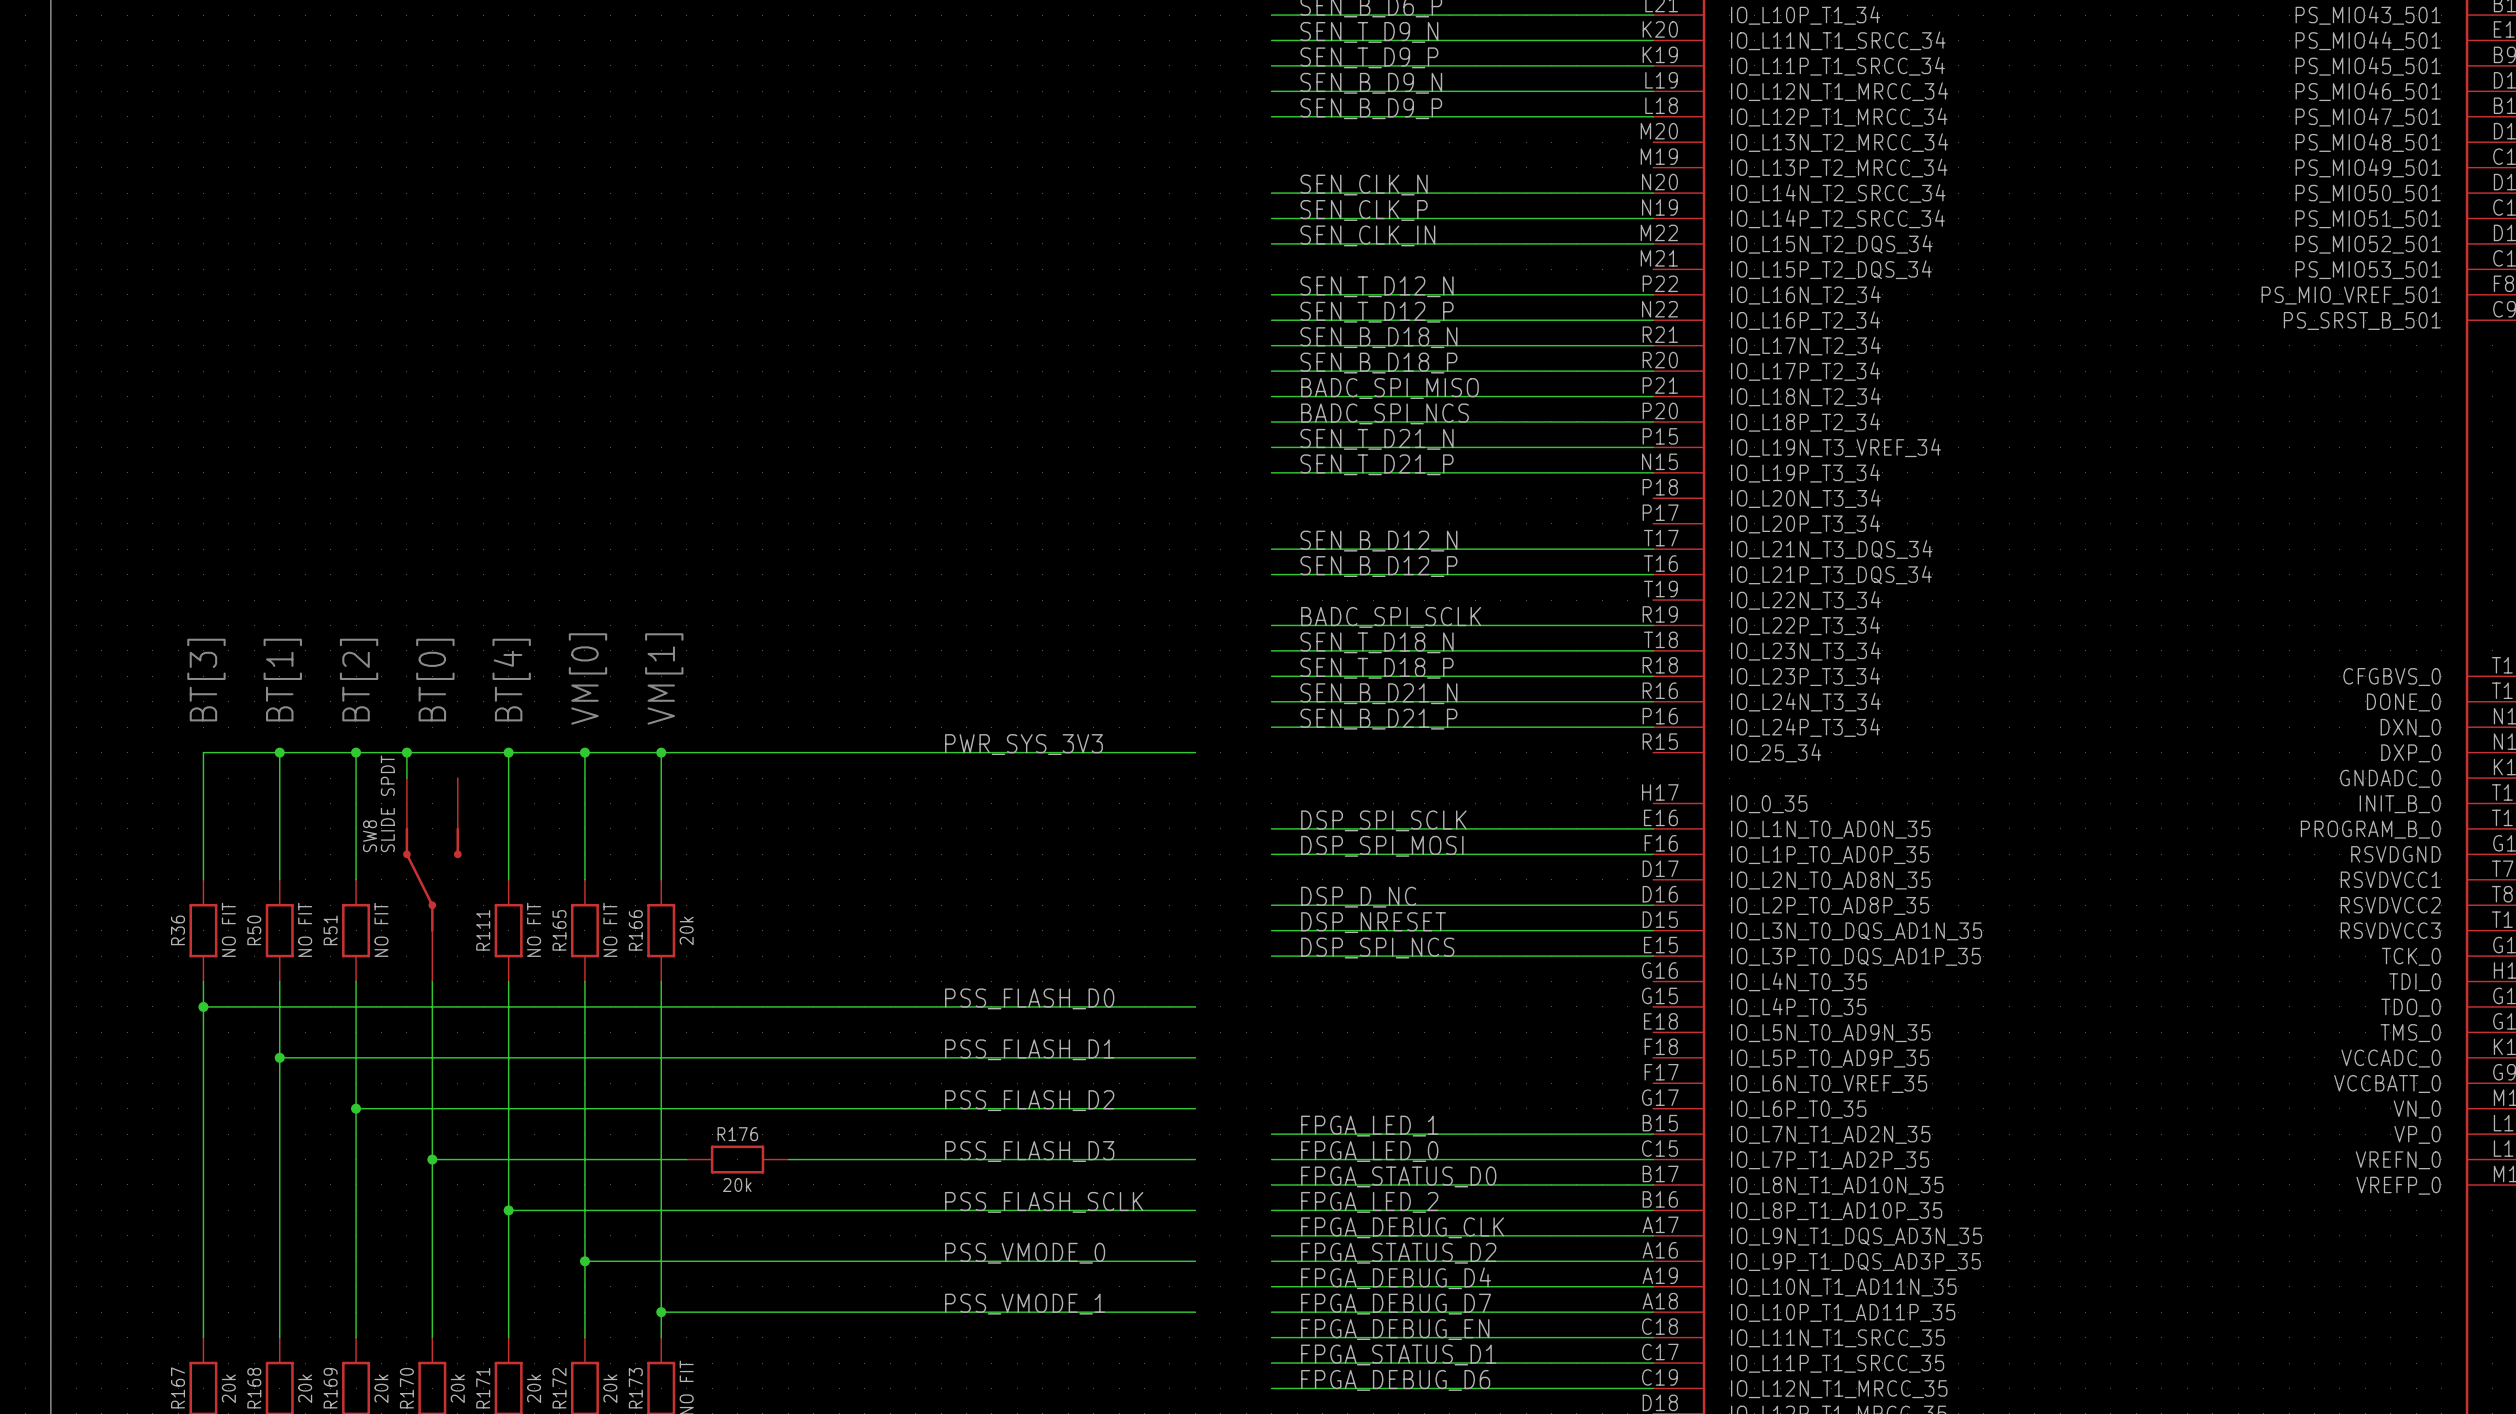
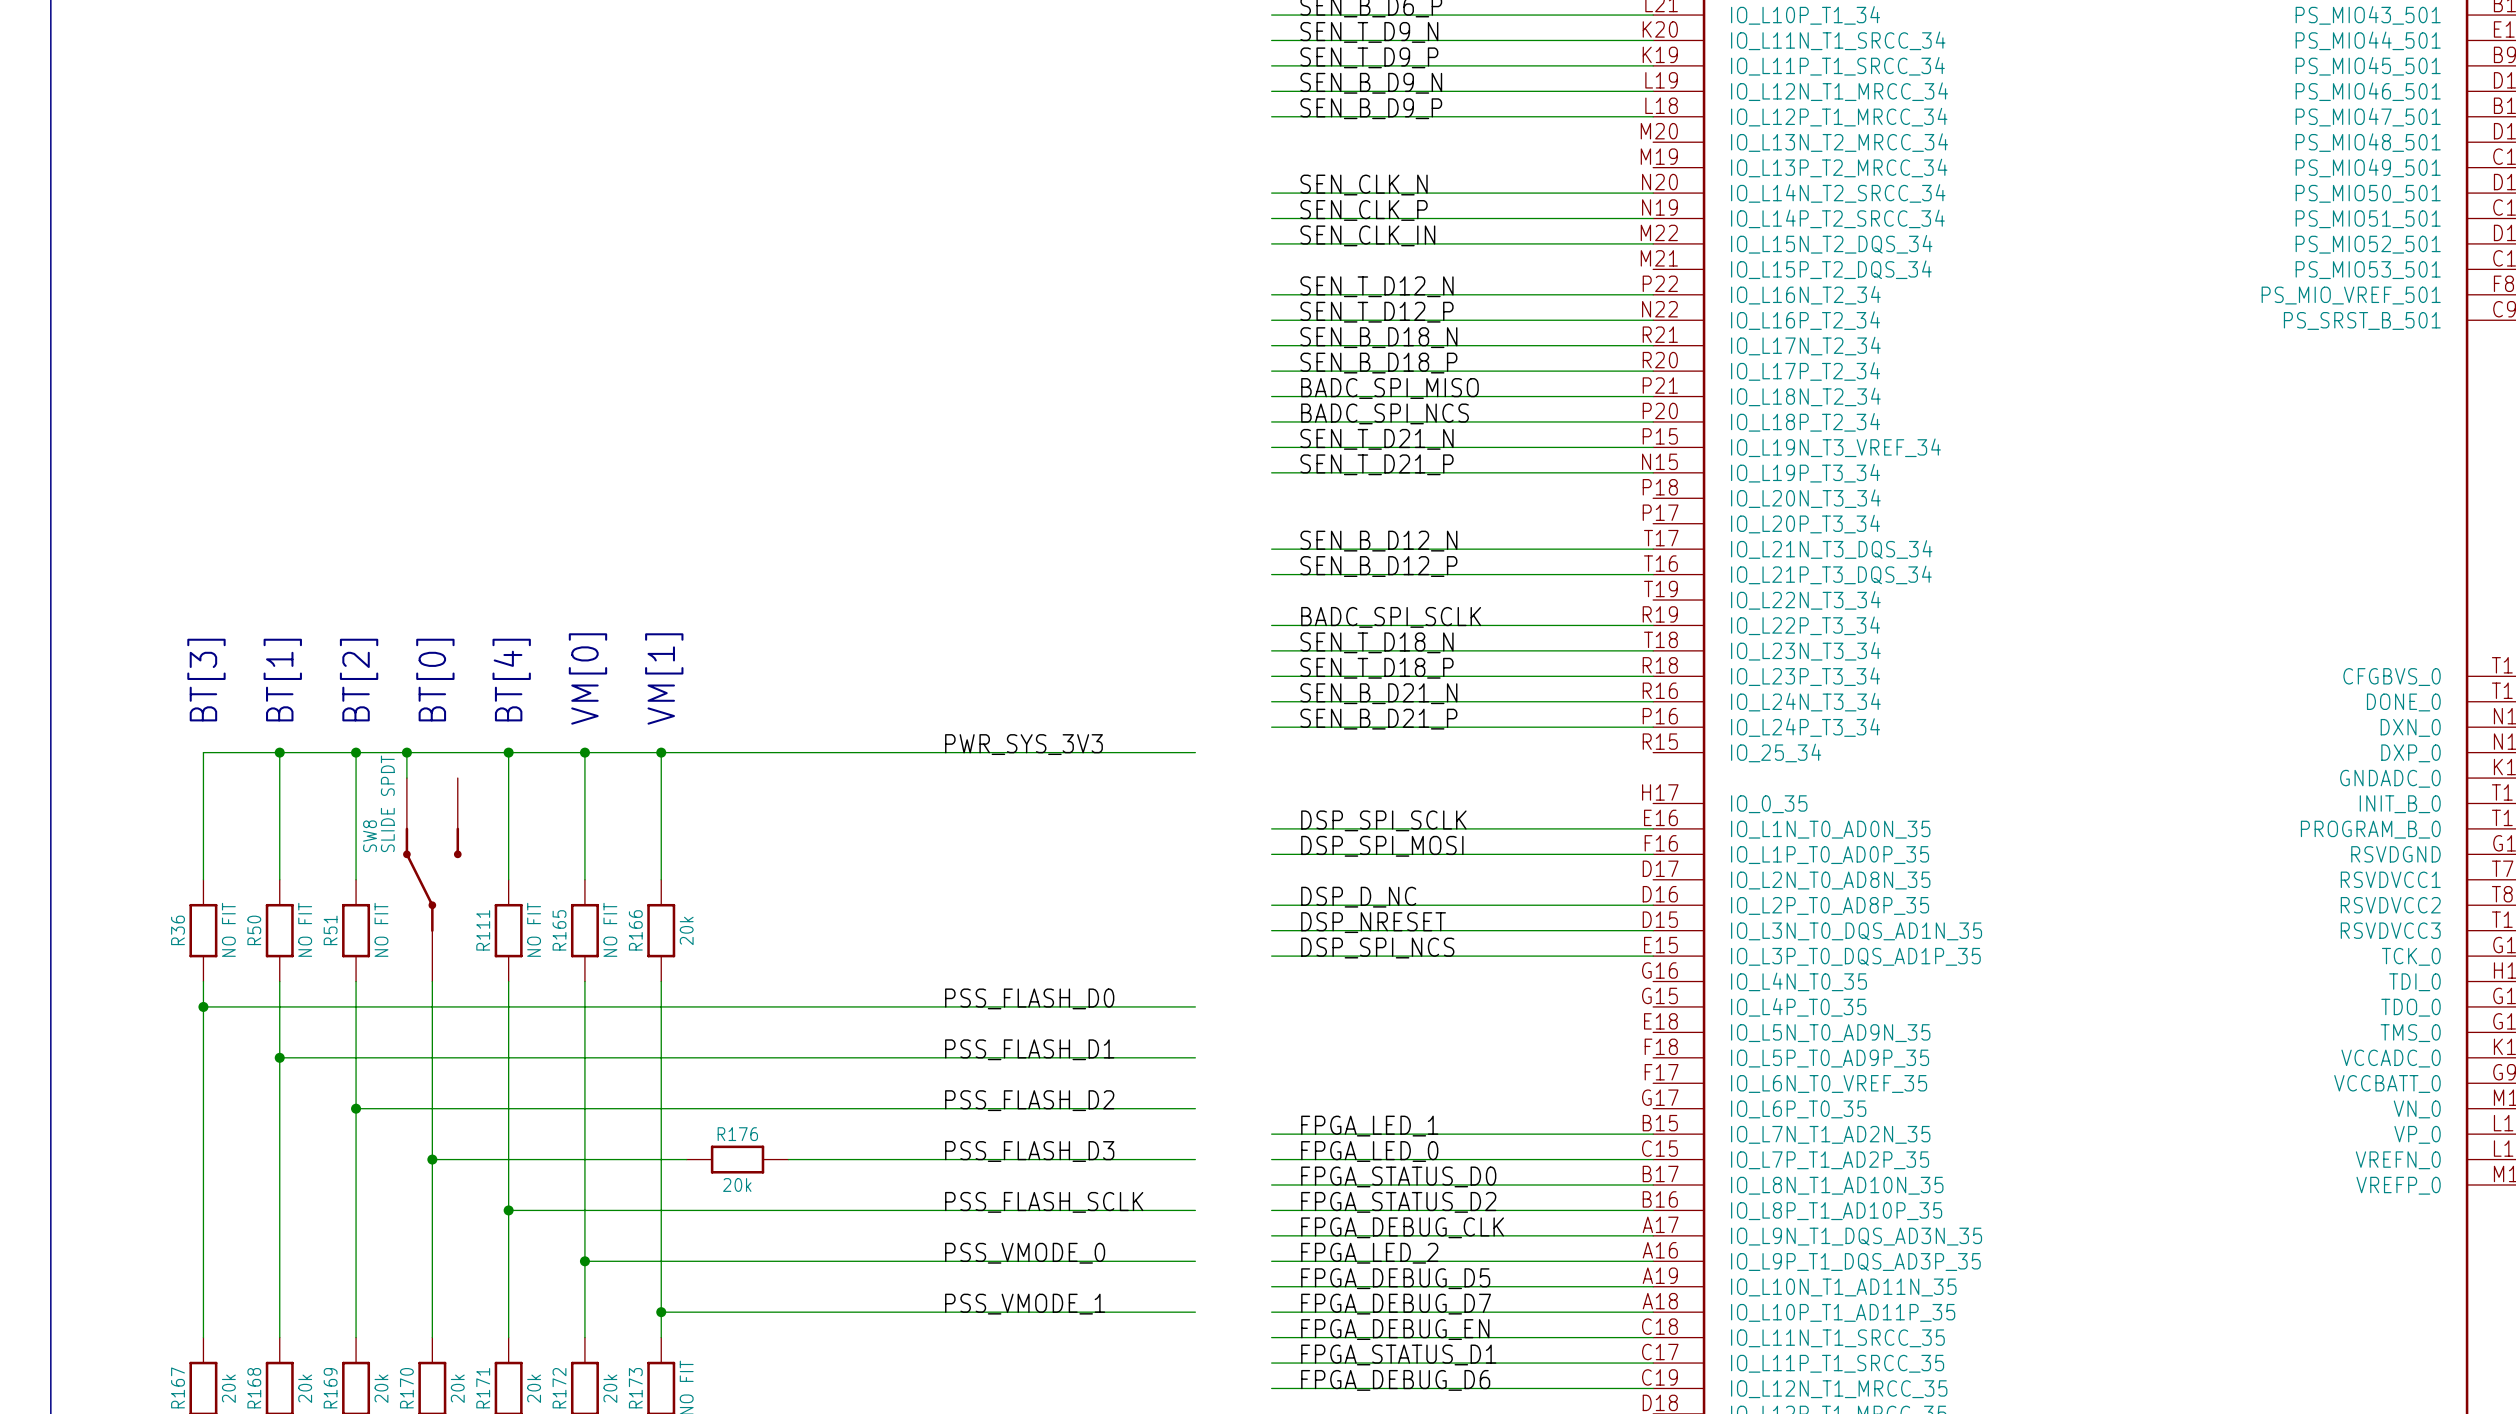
label: FPGA_LED_2 (1369, 1202) -> FPGA_STATUS_D2 (1398, 1202)
label: FPGA_STATUS_D2 (1398, 1253) -> FPGA_LED_2 (1369, 1253)
label: FPGA_DEBUG_D4 (1396, 1278) -> FPGA_DEBUG_D5 (1395, 1278)

